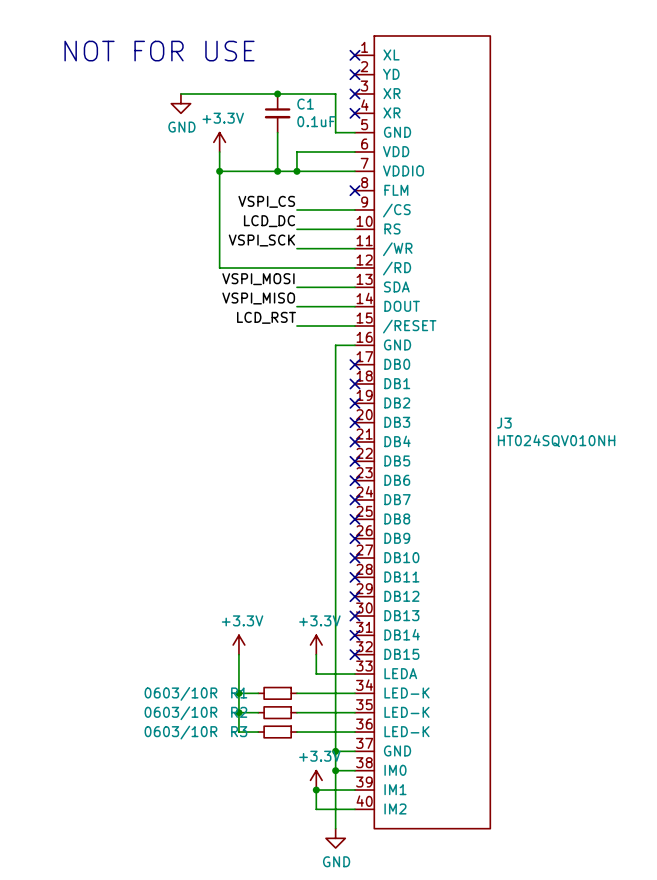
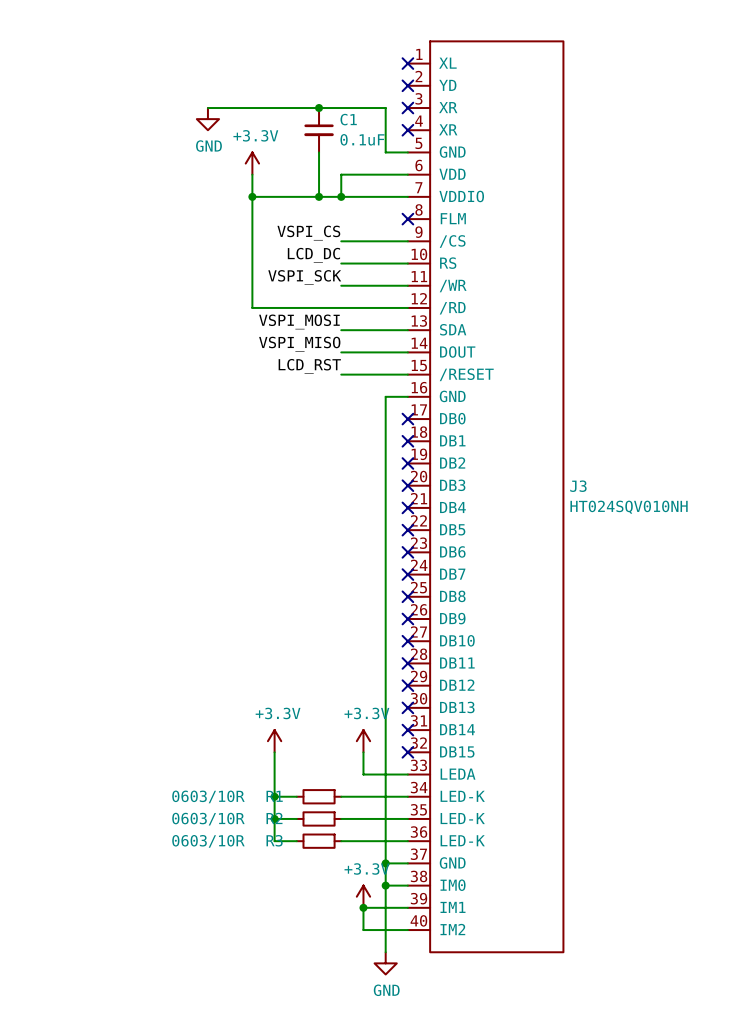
text: NOT FOR USE (159, 51) -> none

